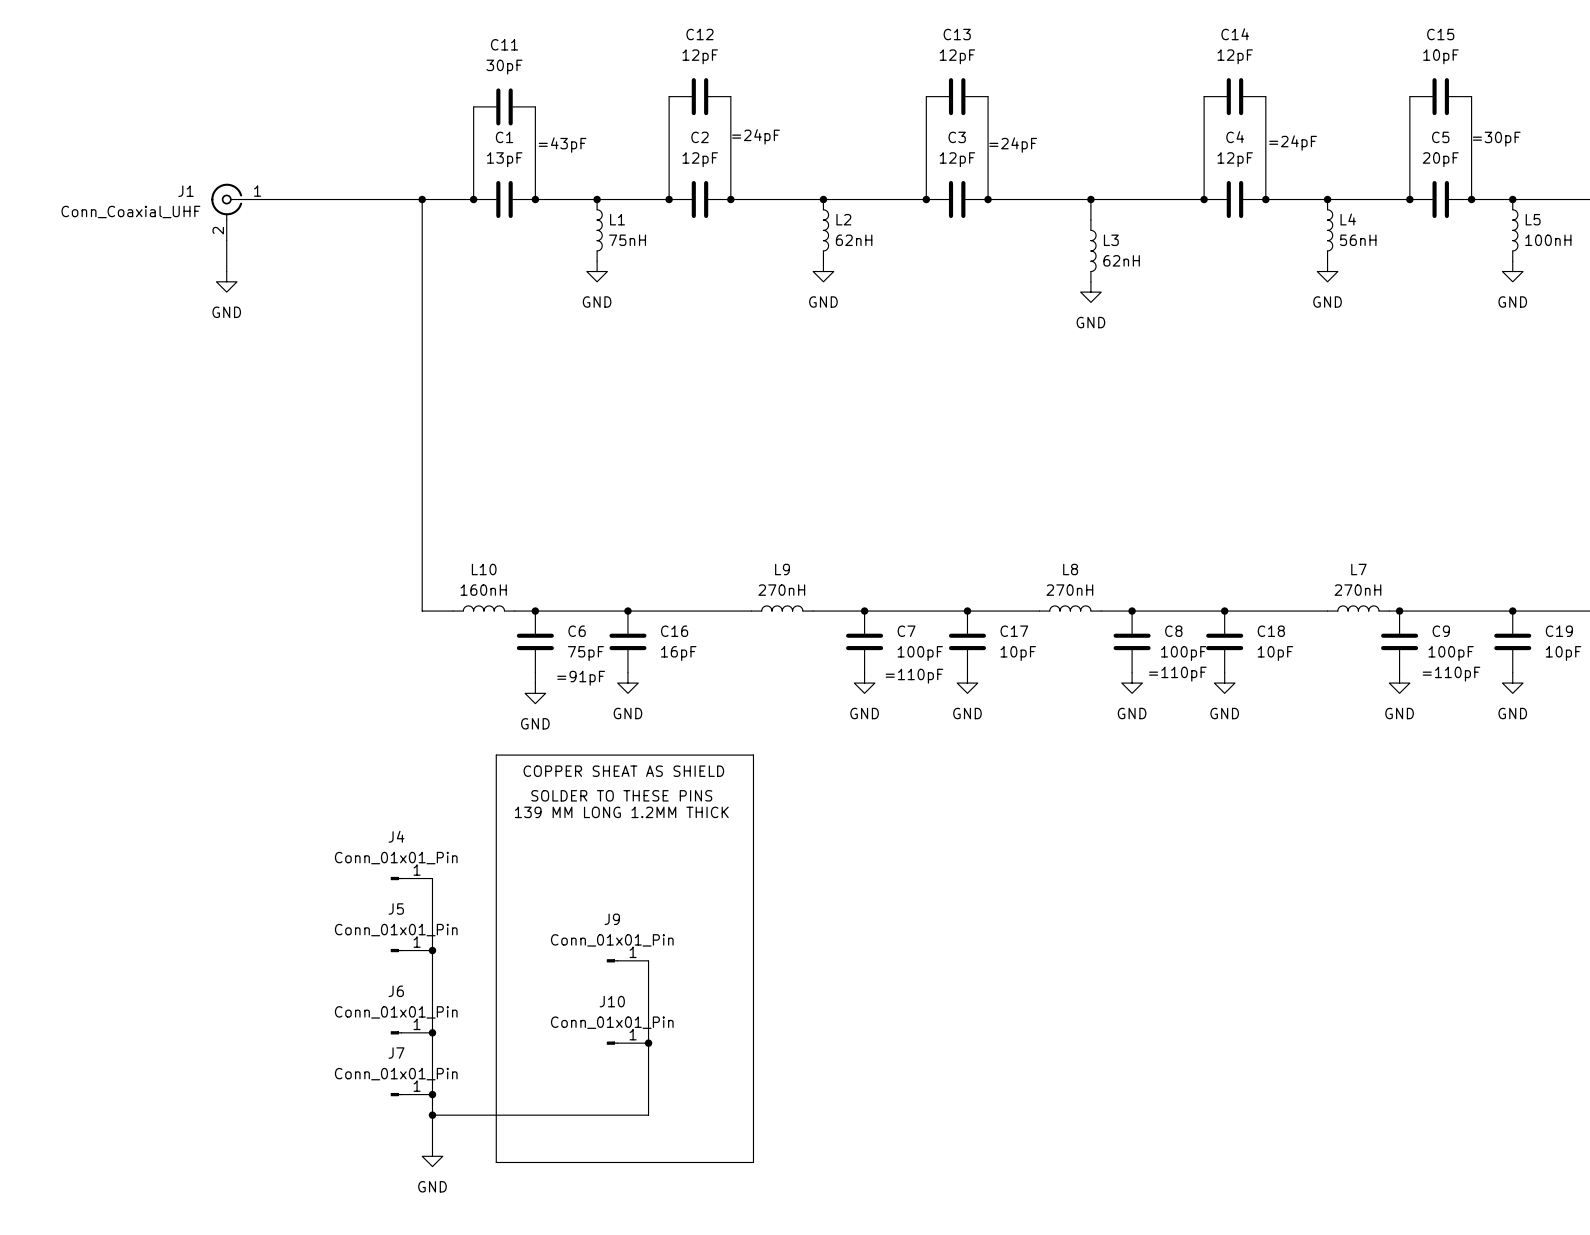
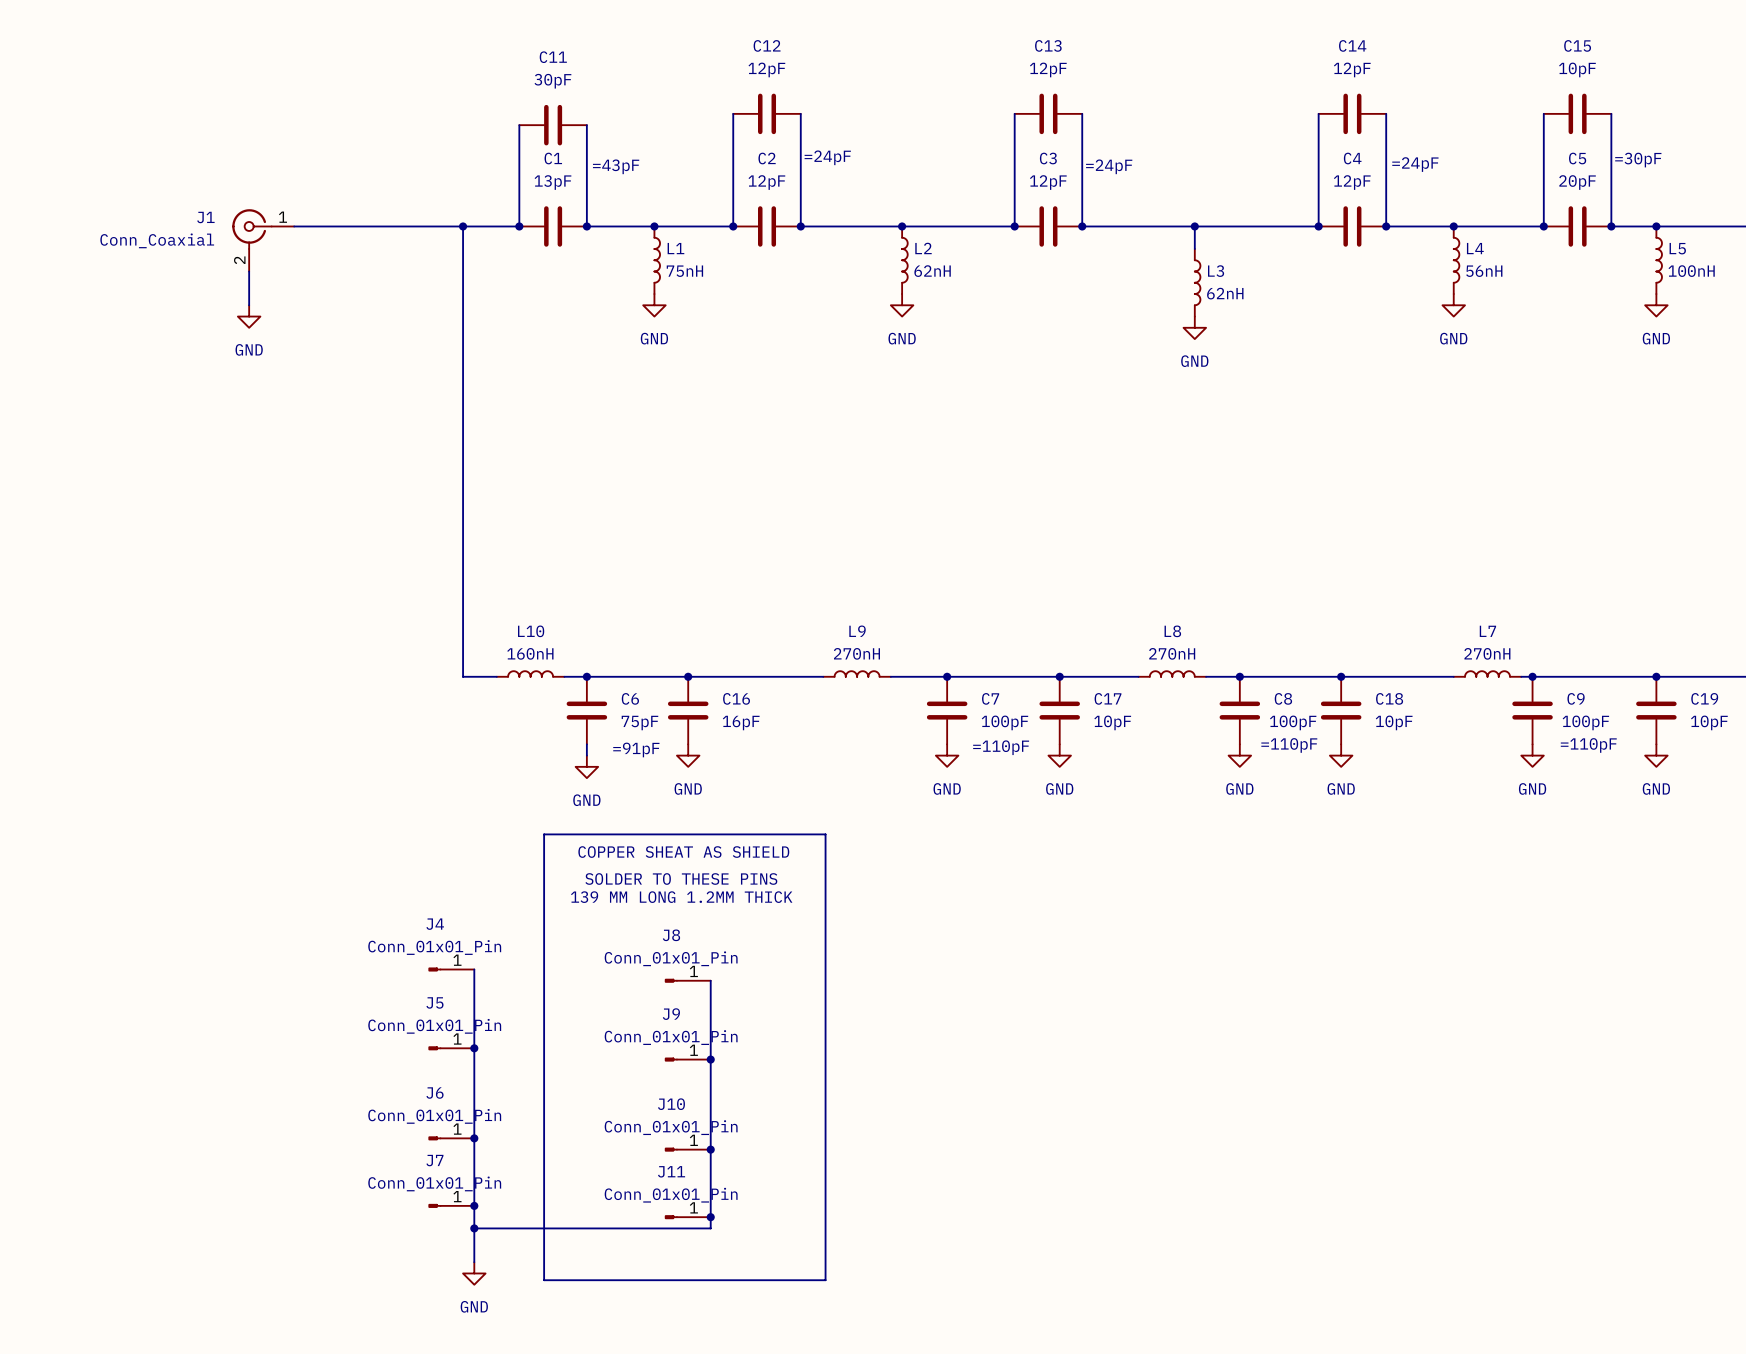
J1 value: Conn_Coaxial_UHF (130, 211) -> Conn_Coaxial (157, 240)
J8: none -> Conn_01x01_Pin (687, 980)
wire: none -> (710, 980) (710, 1059)
junction: none -> (710, 1059)
J11: none -> Conn_01x01_Pin (687, 1217)
junction: none -> (710, 1217)

